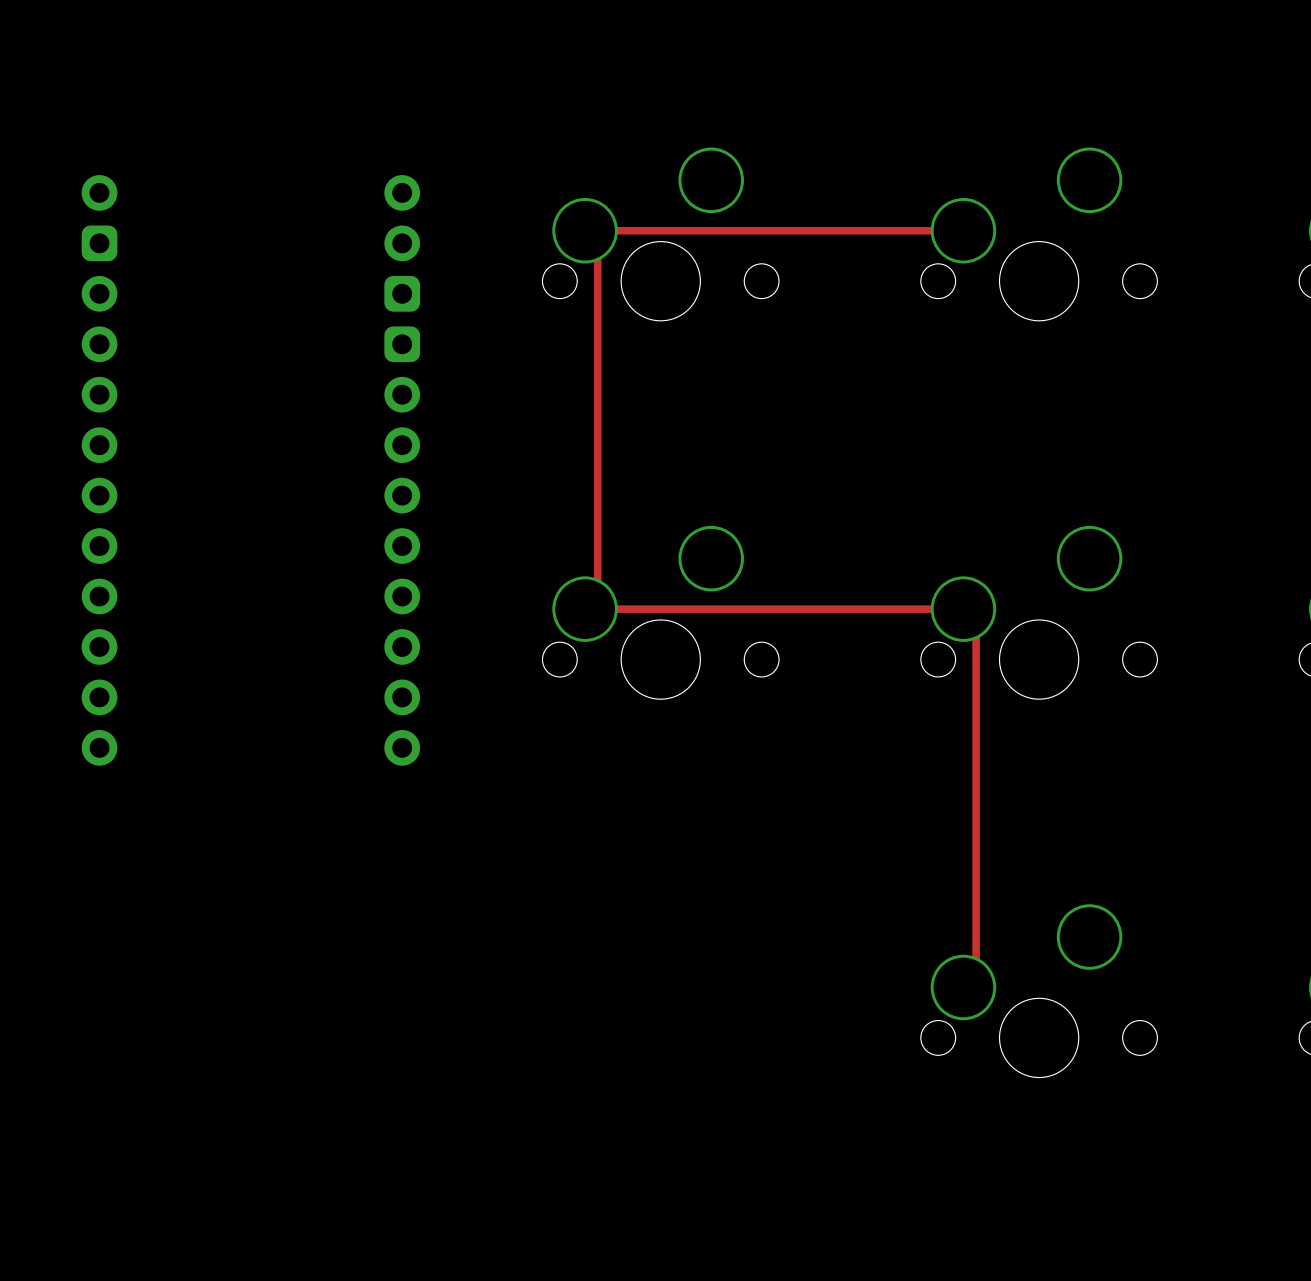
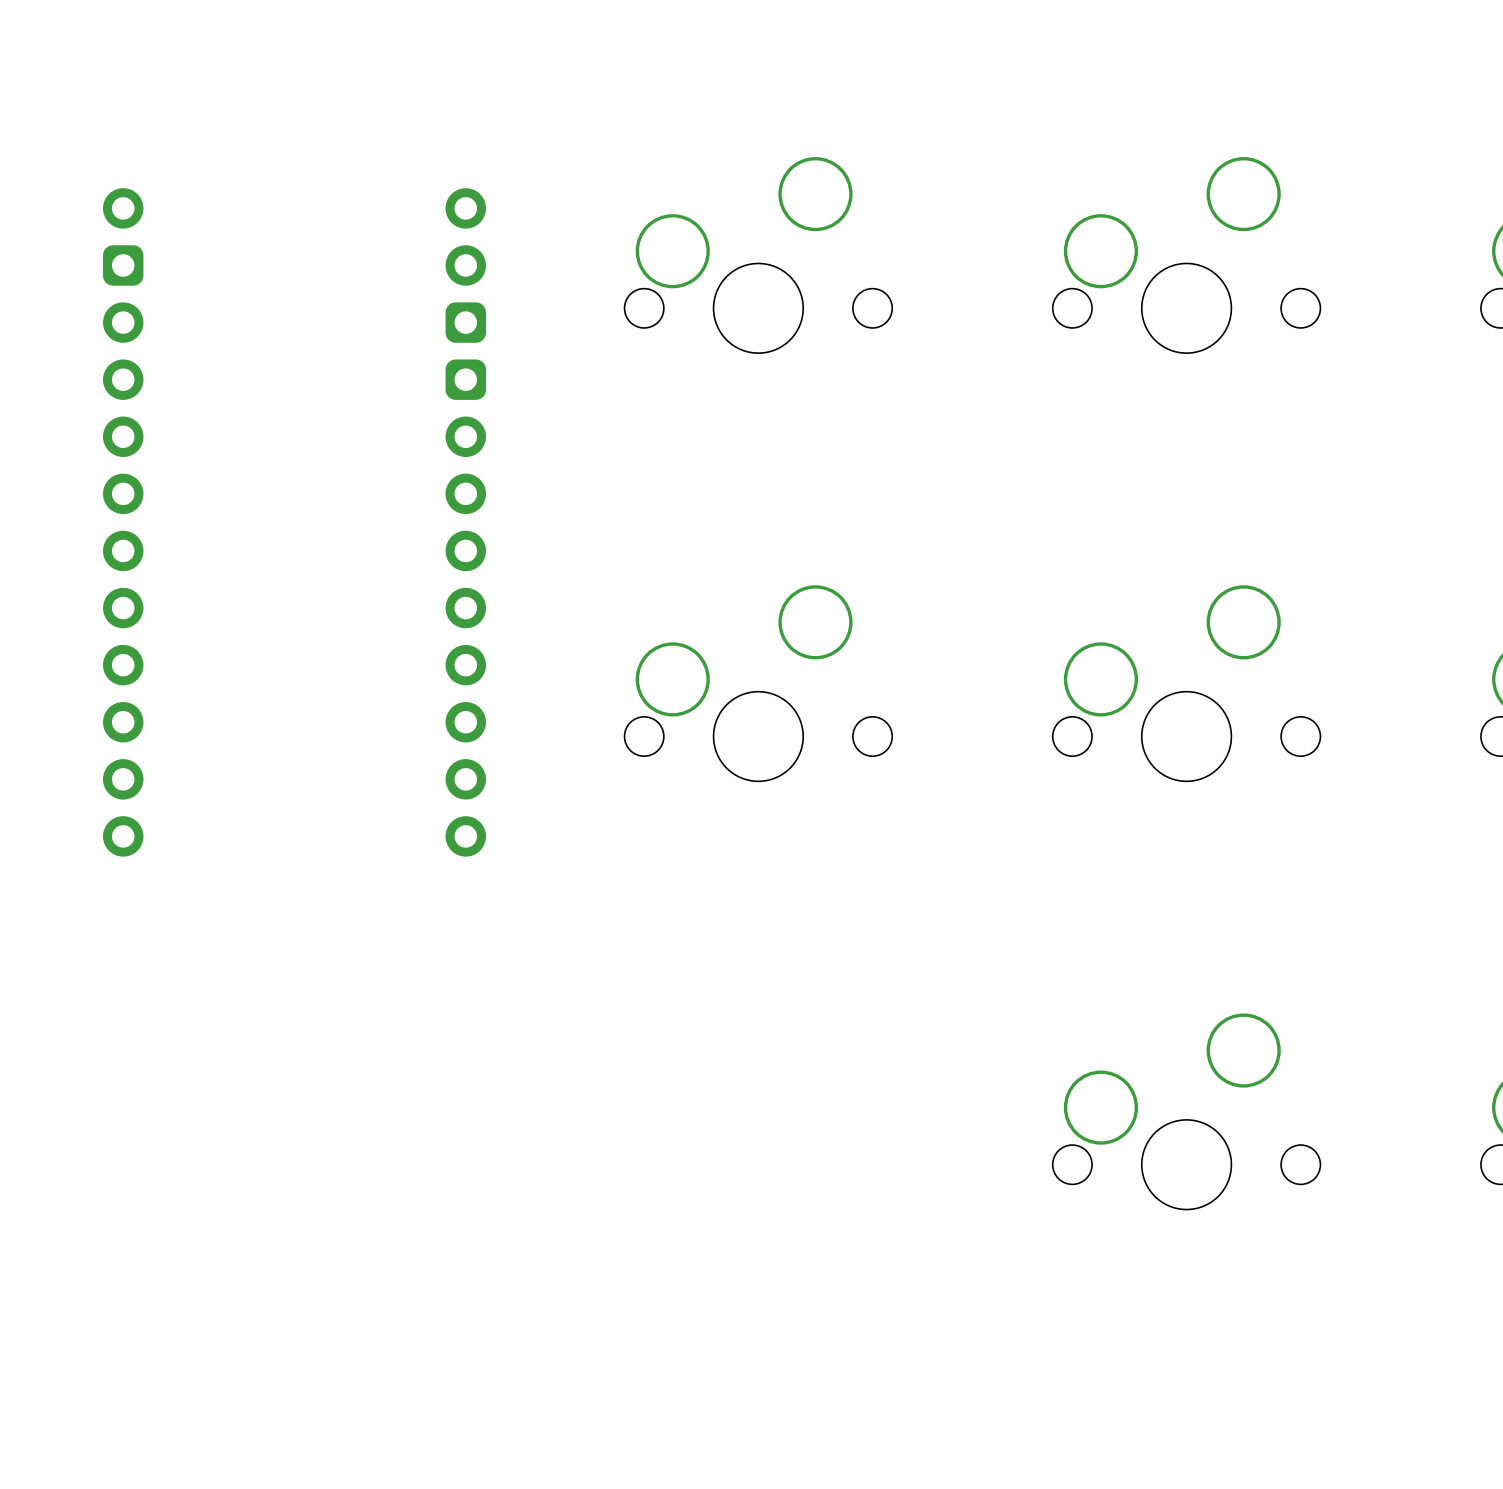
track: (963, 230) (585, 230) (597, 243) (597, 596) (585, 609) (963, 609) (976, 621) (976, 974) (963, 987) -> none

